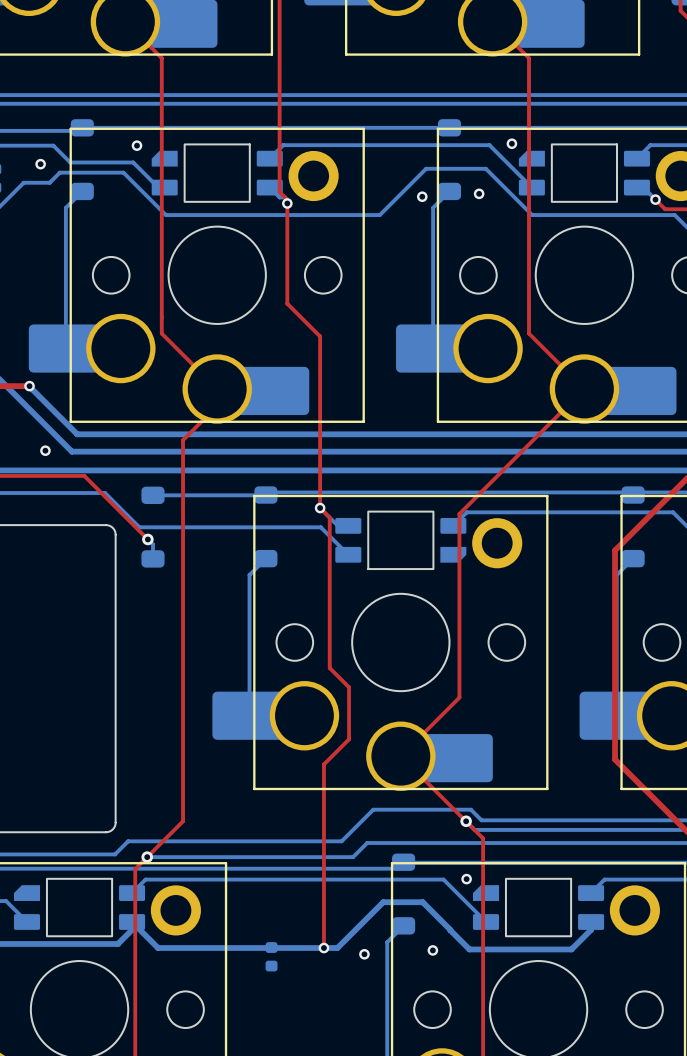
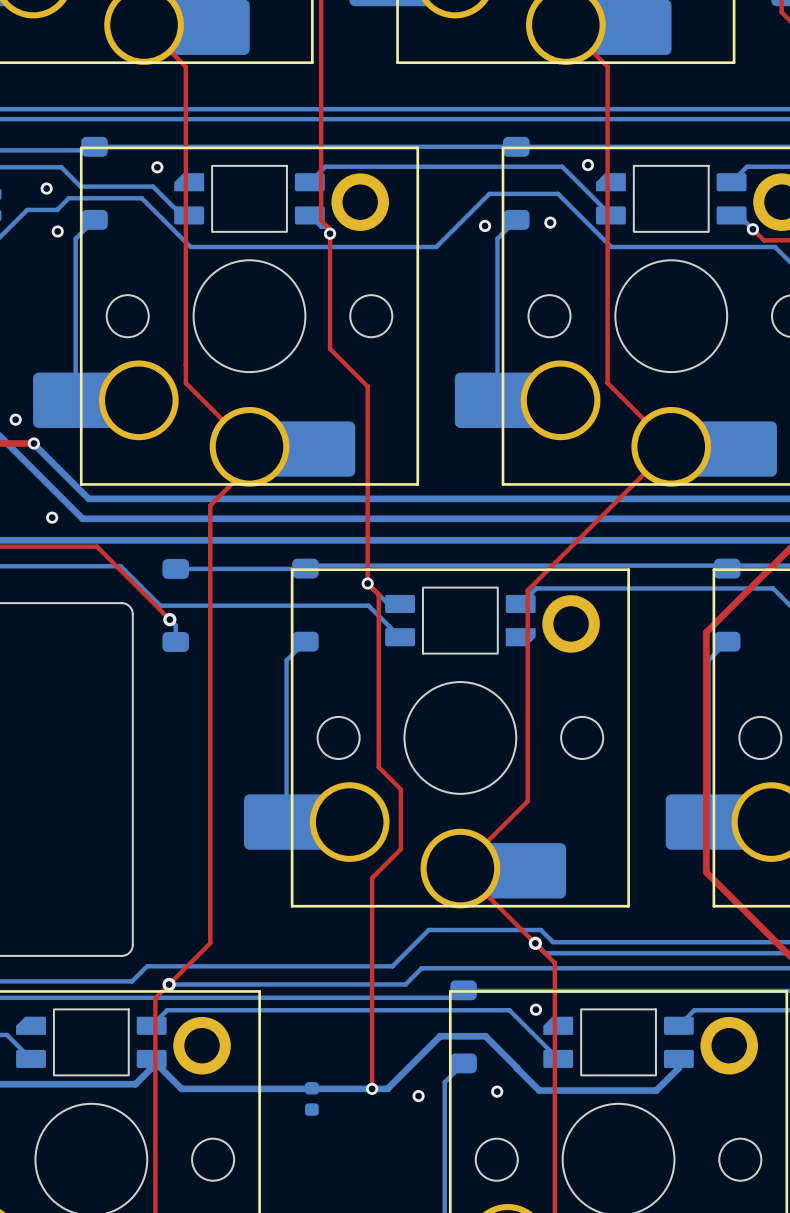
via: none -> (57, 231)
via: none -> (15, 419)

